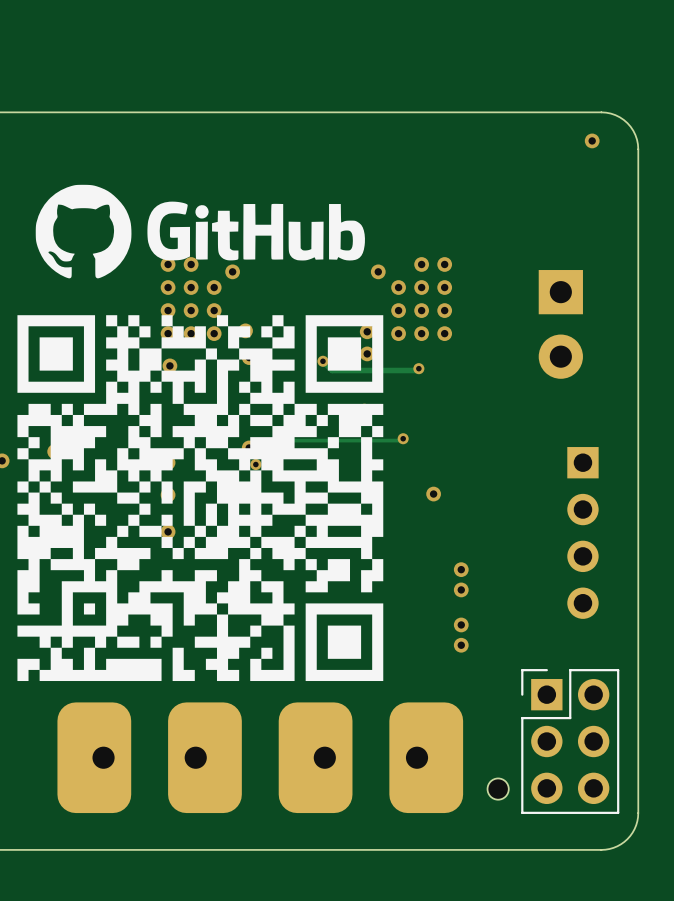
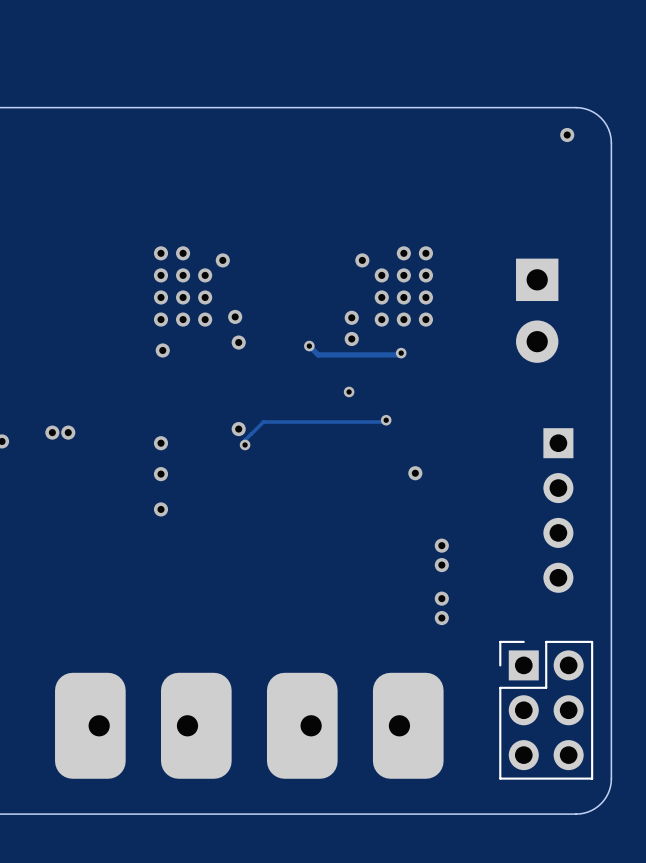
drawing: [35, 184, 365, 279] -> none
drawing: [17, 315, 384, 682] -> none
part: (498, 789) -> none

